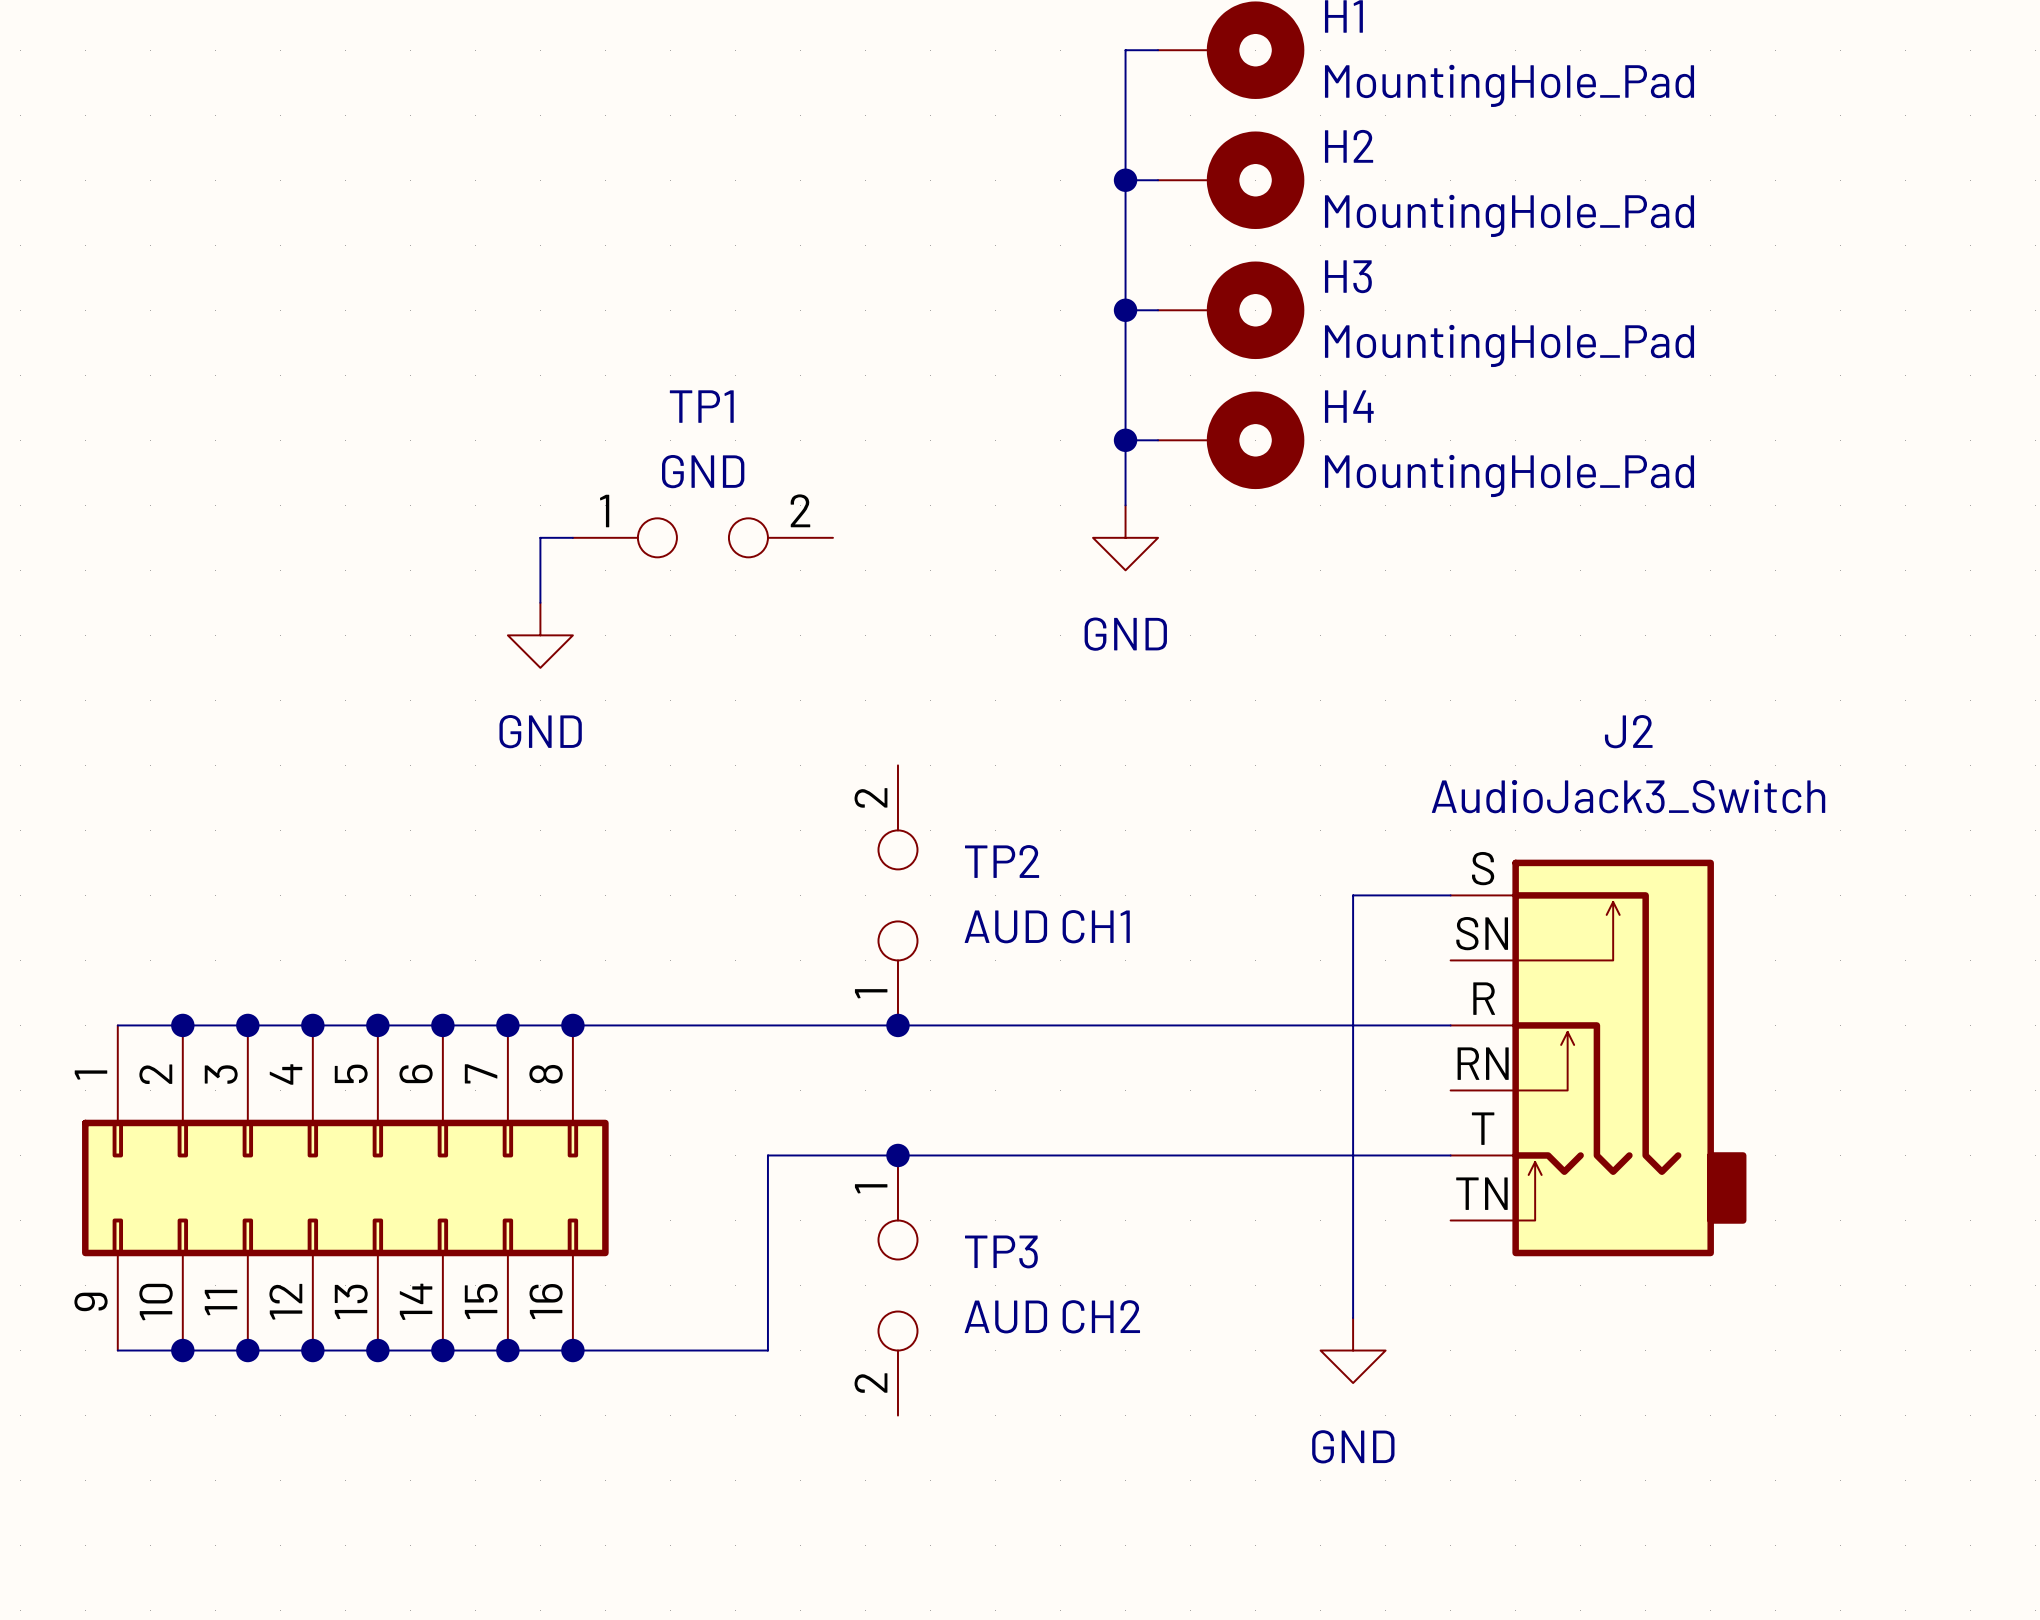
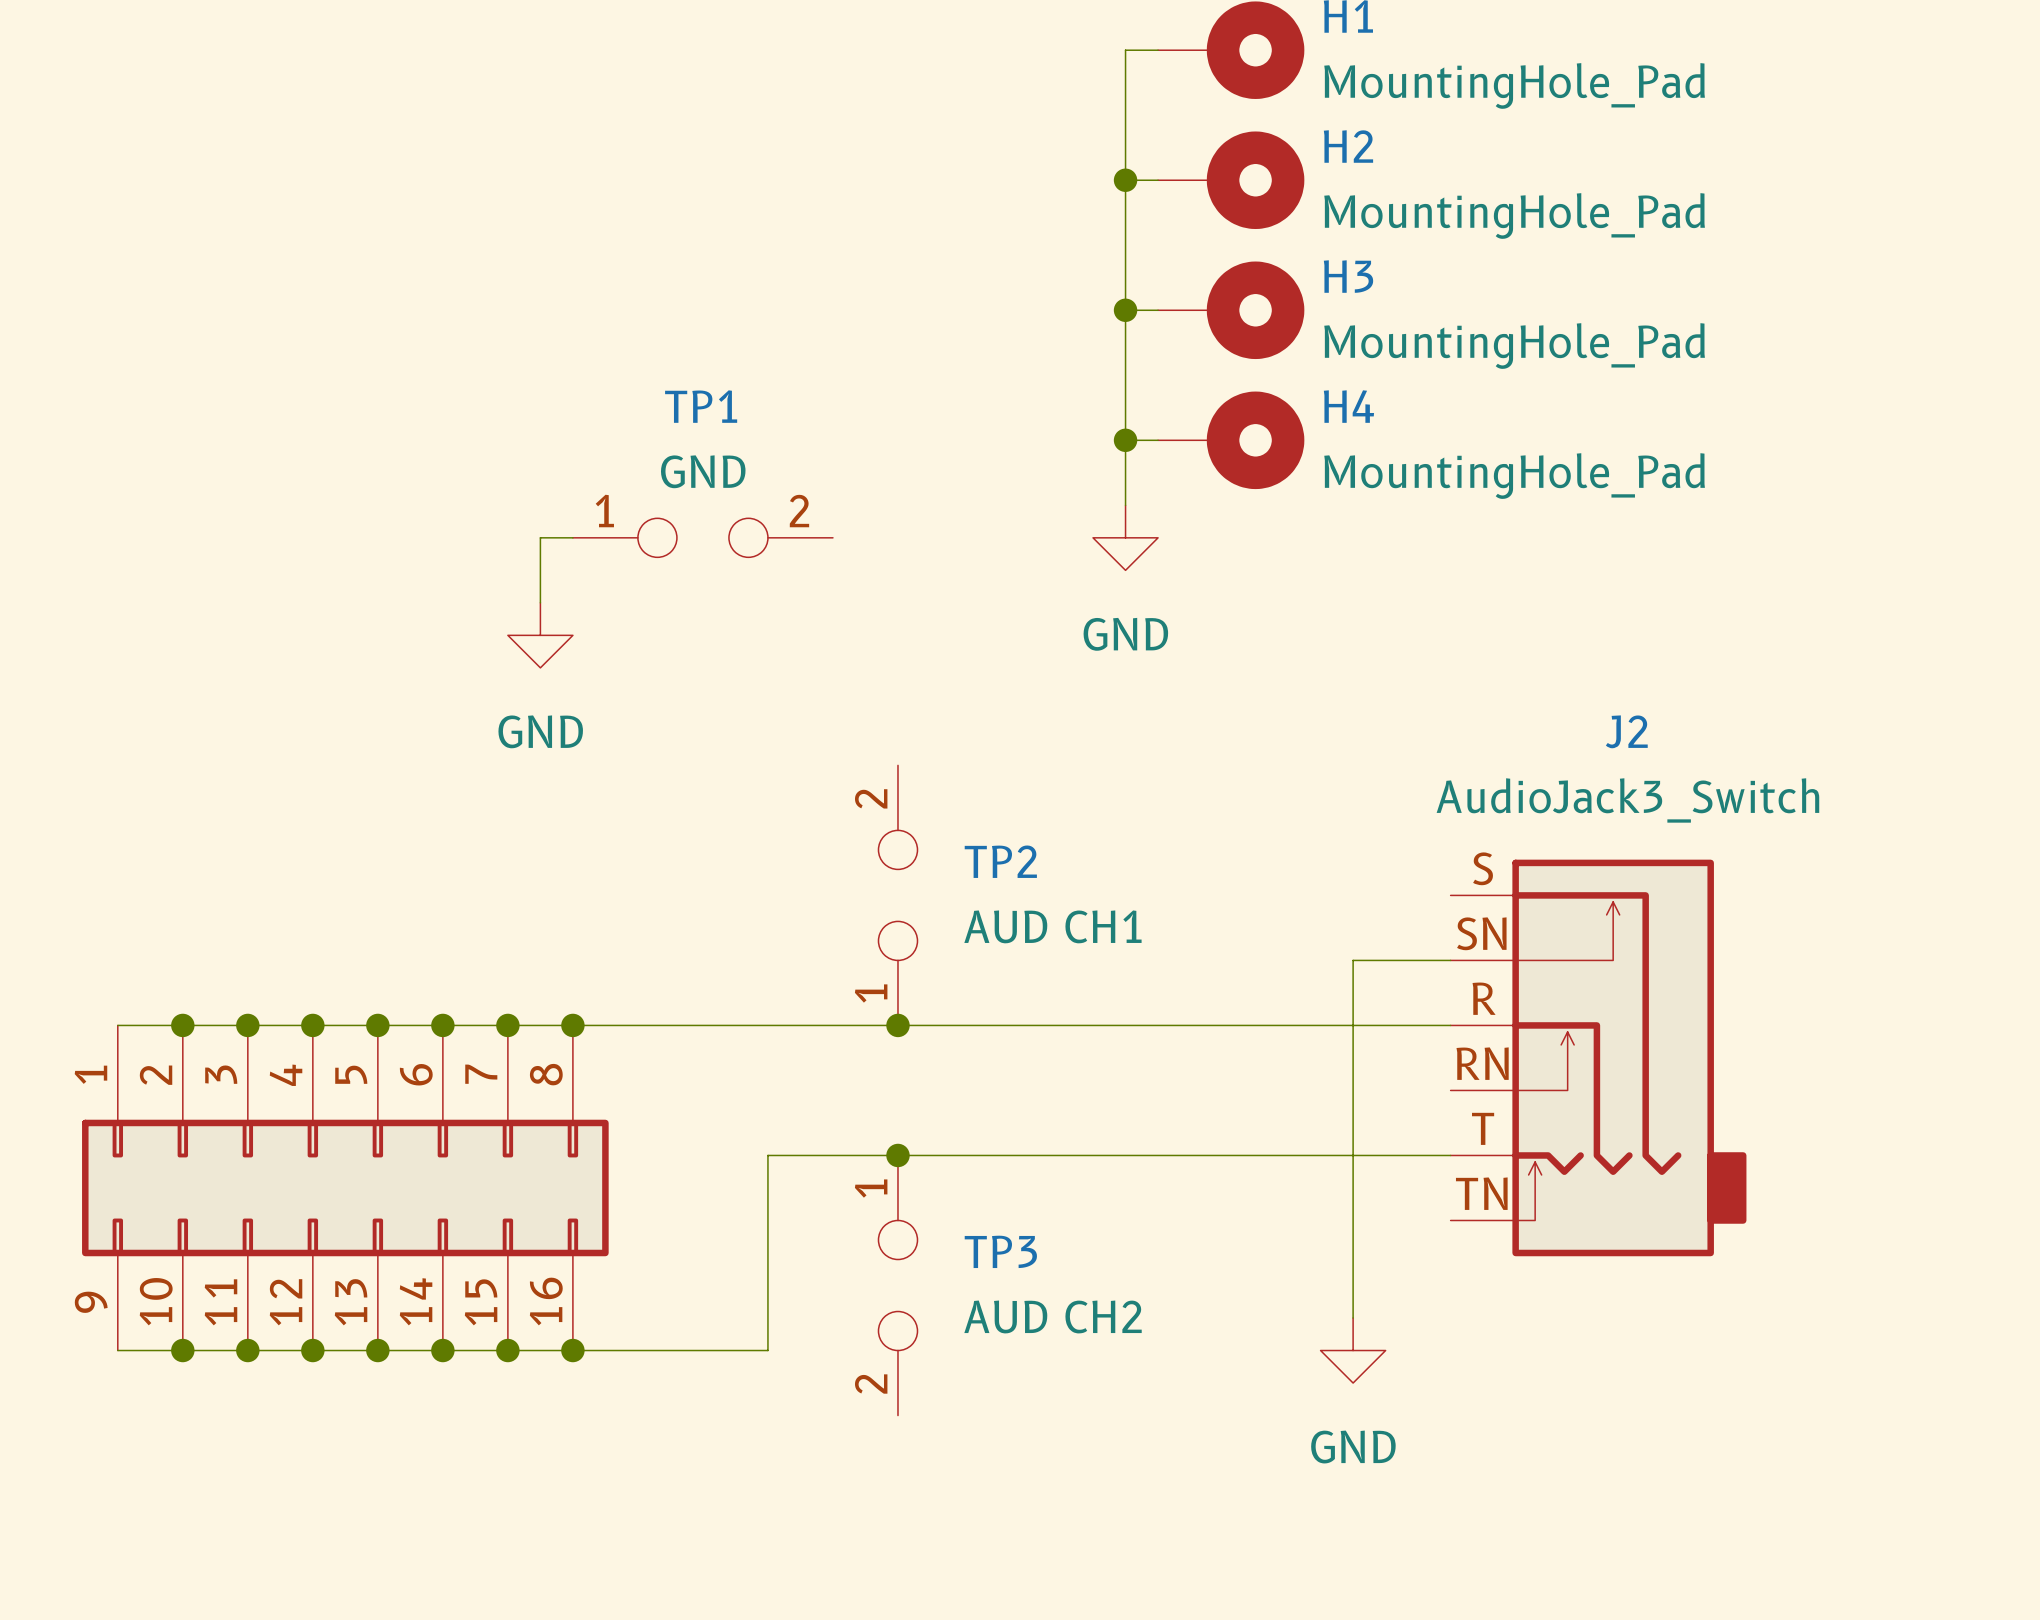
wire: (1450, 895) (1353, 895) (1353, 960) -> (1450, 960) (1353, 960)

